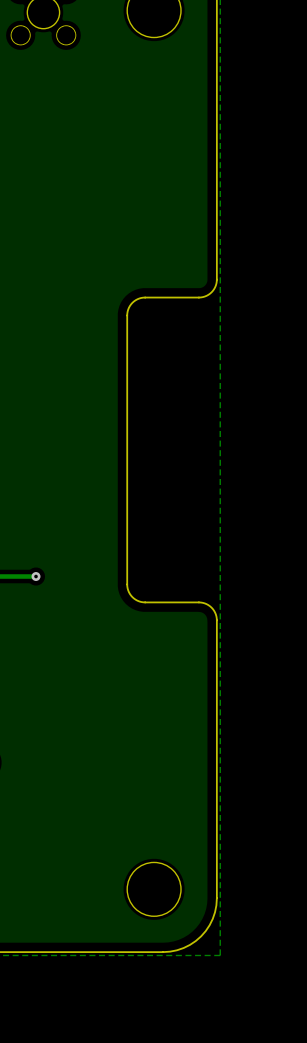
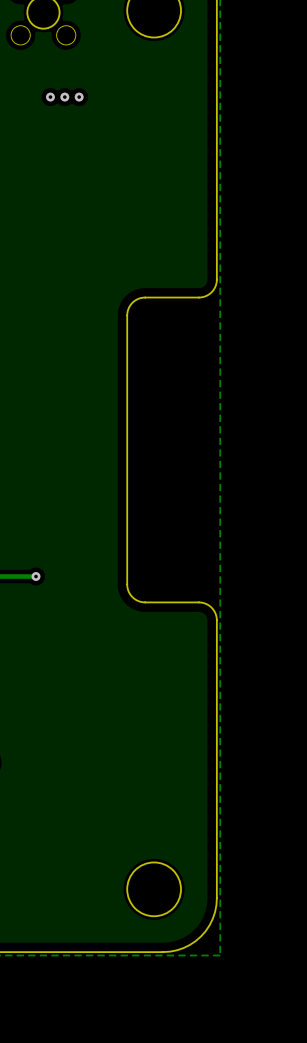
via: none -> (50, 97)
via: none -> (64, 97)
via: none -> (79, 97)

